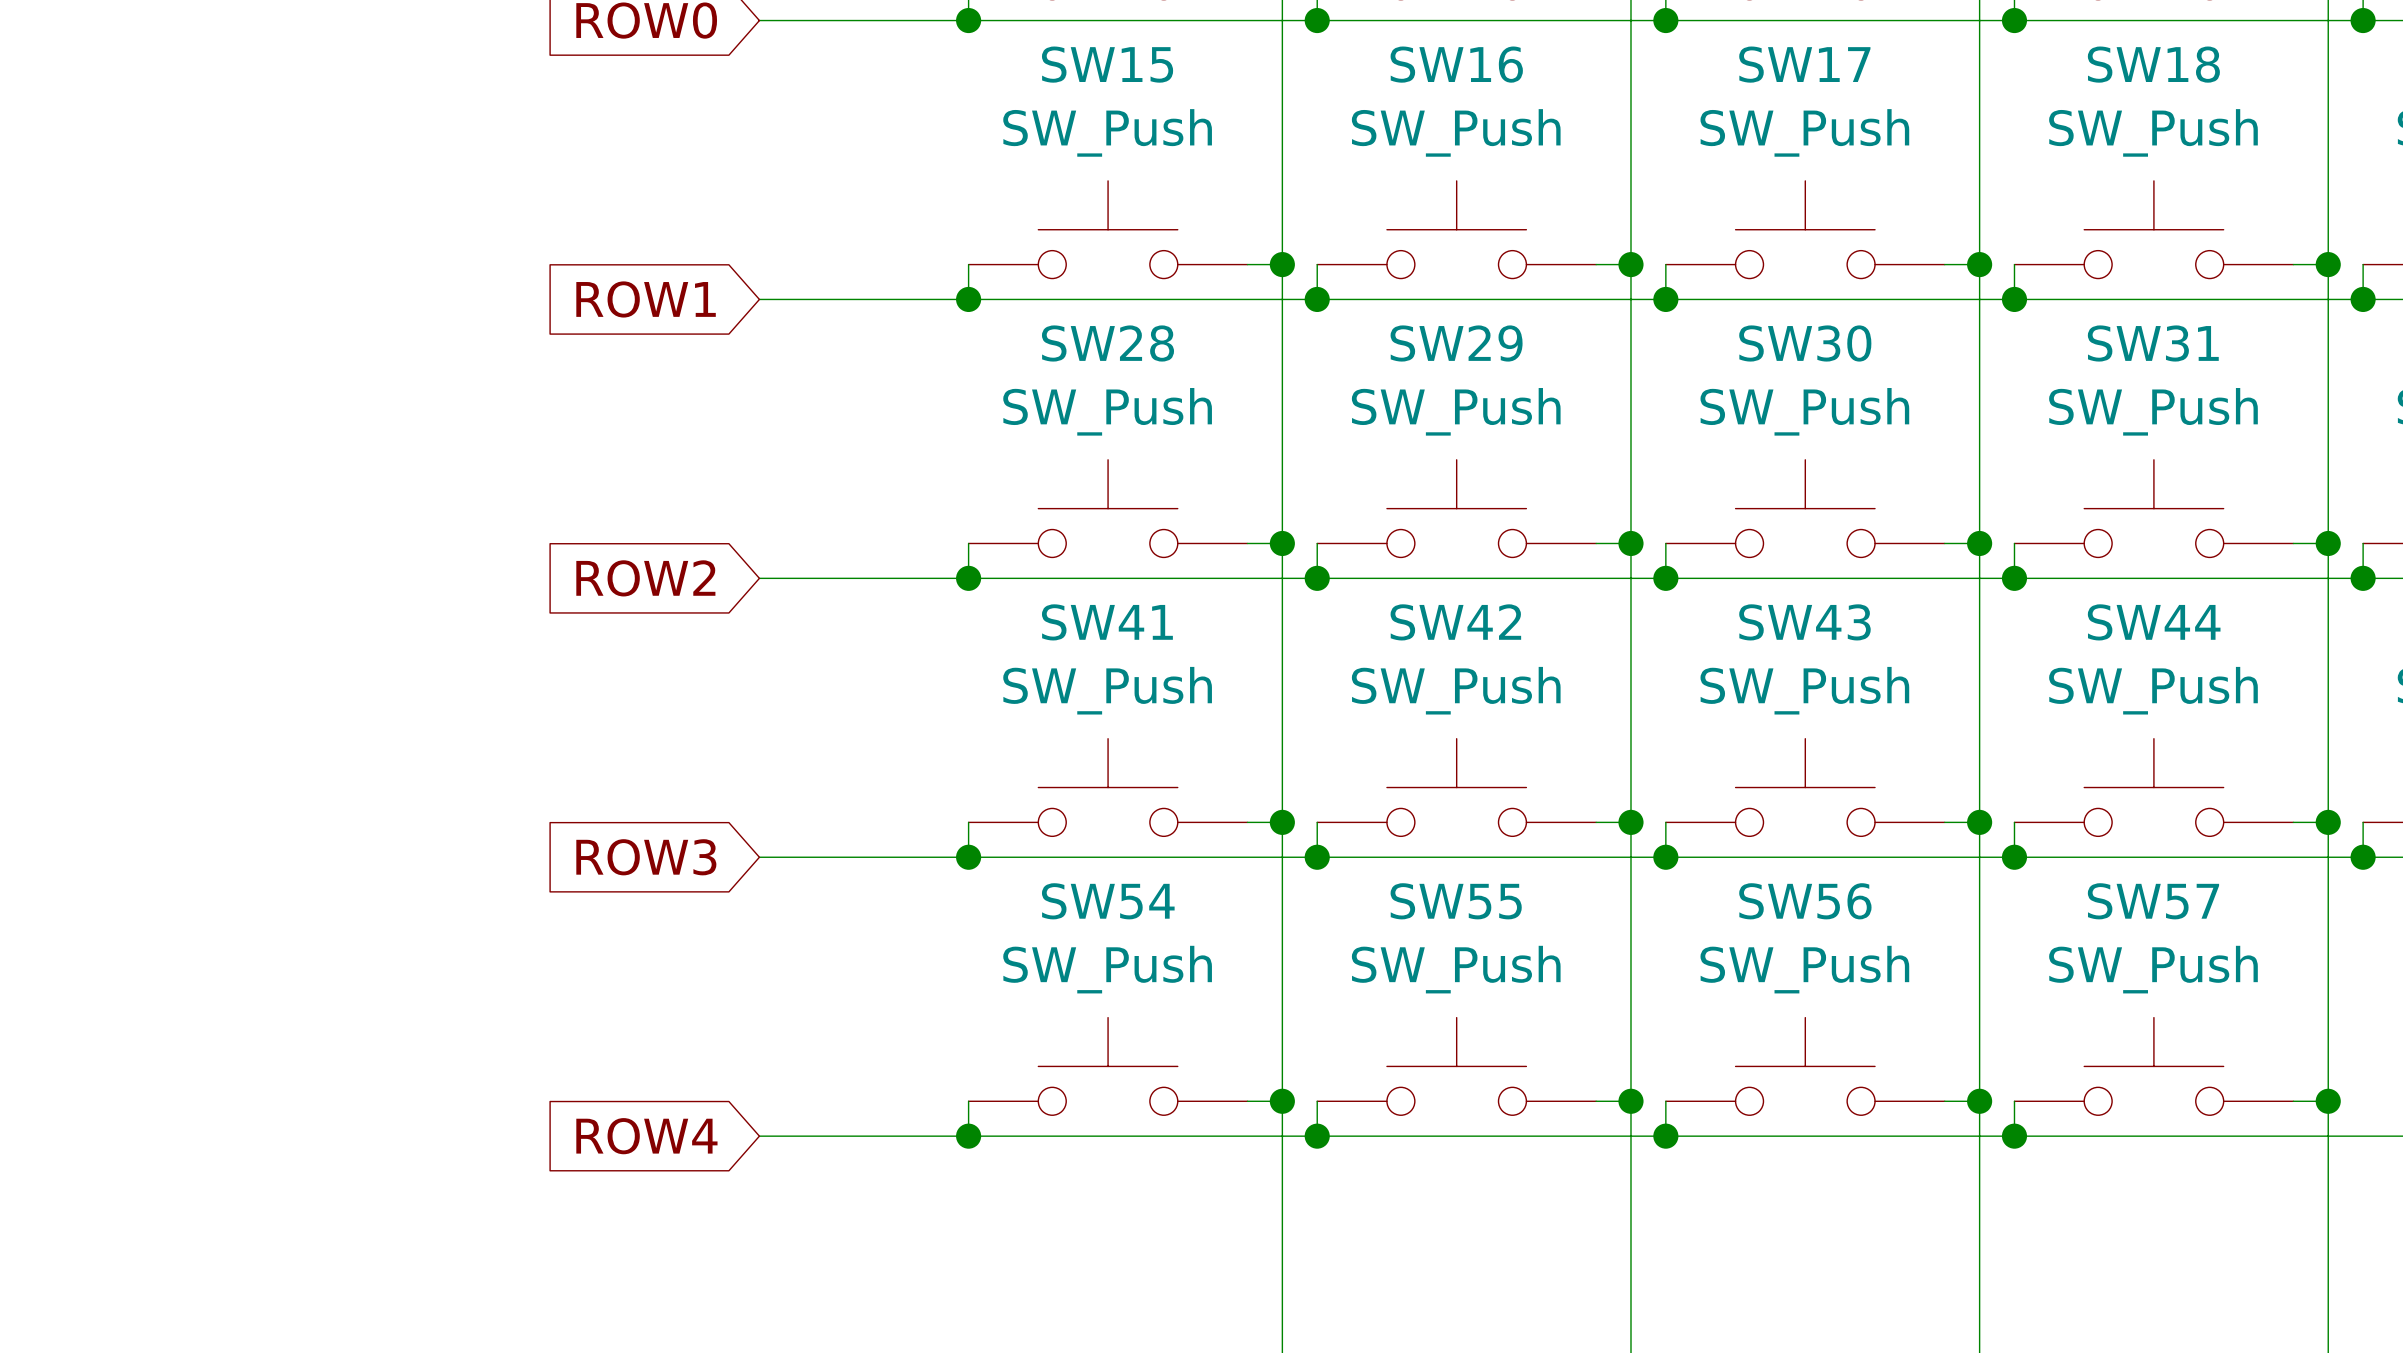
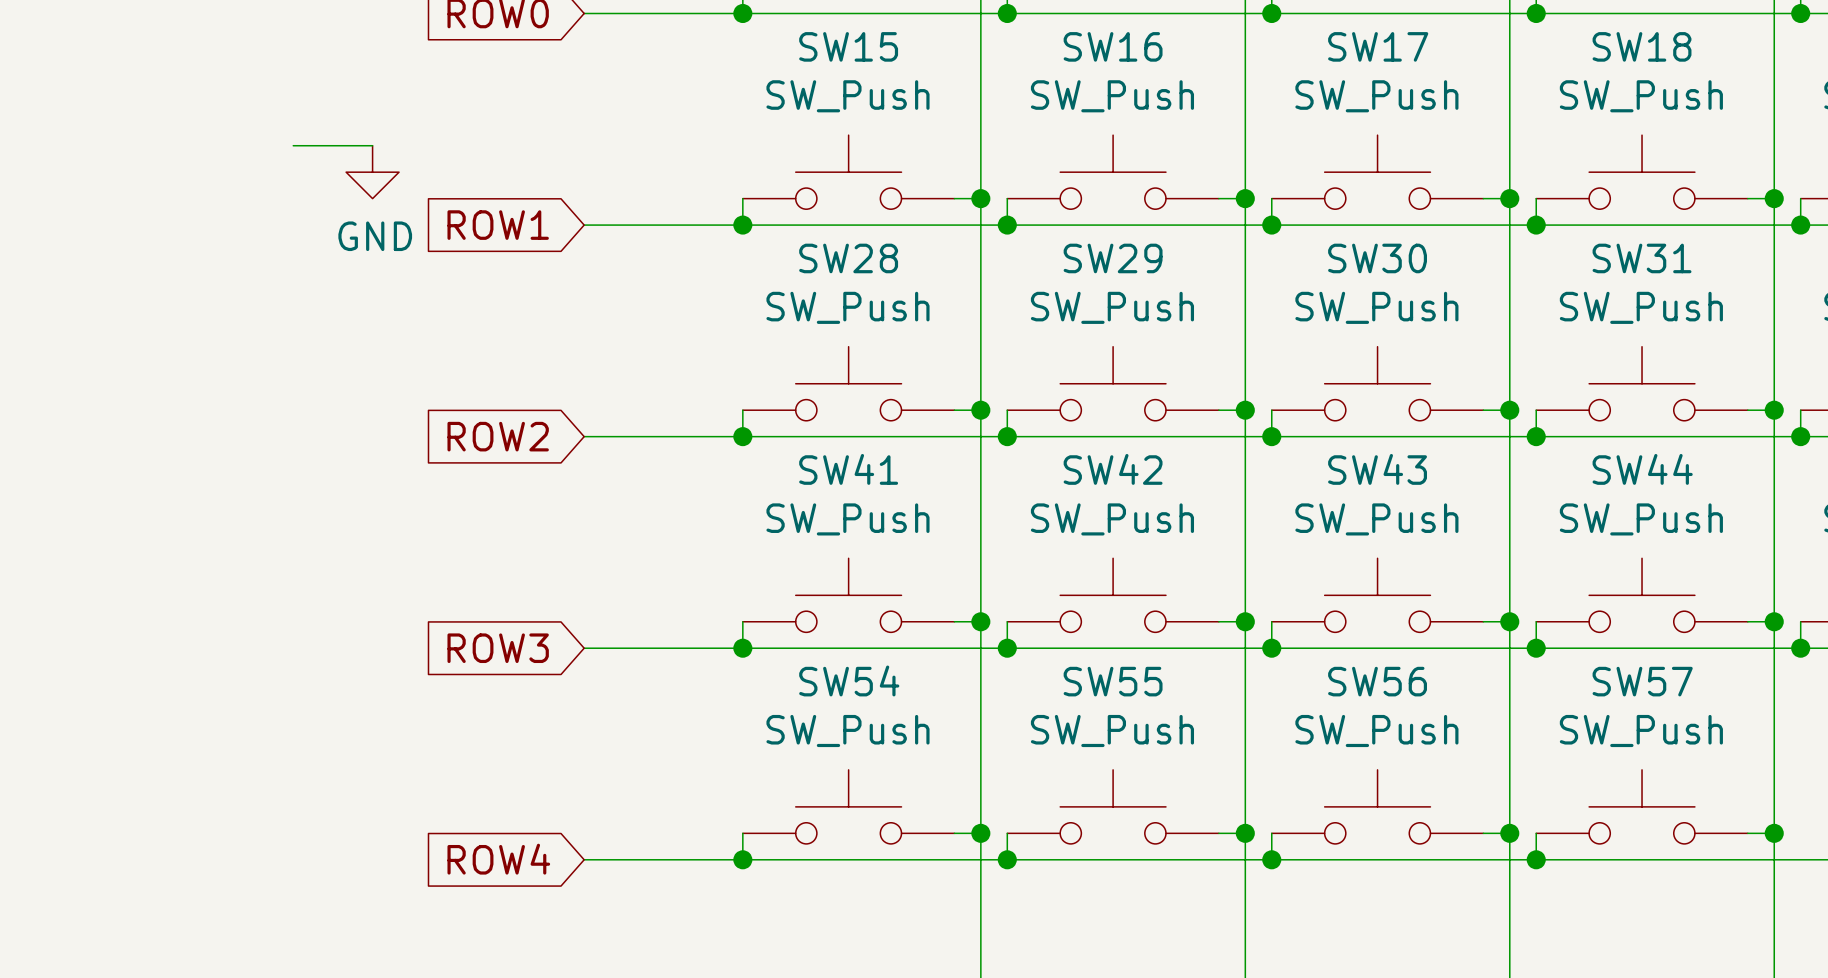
wire: none -> (293, 145) (372, 145)
power symbol: none -> GND (372, 172)

